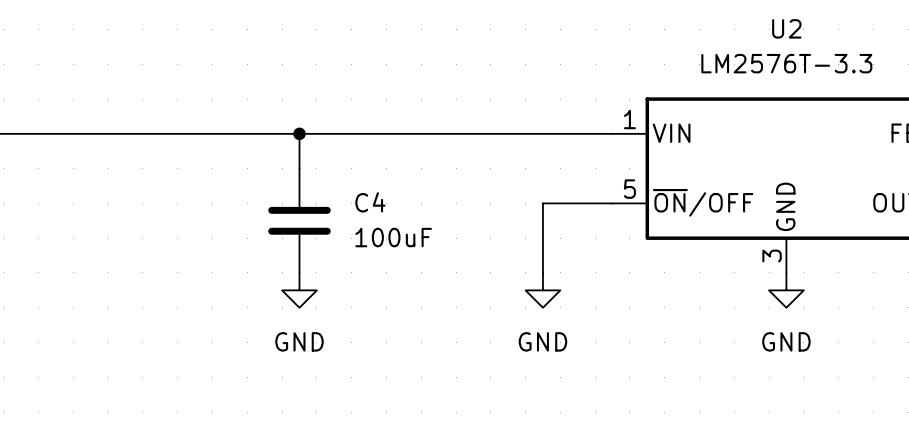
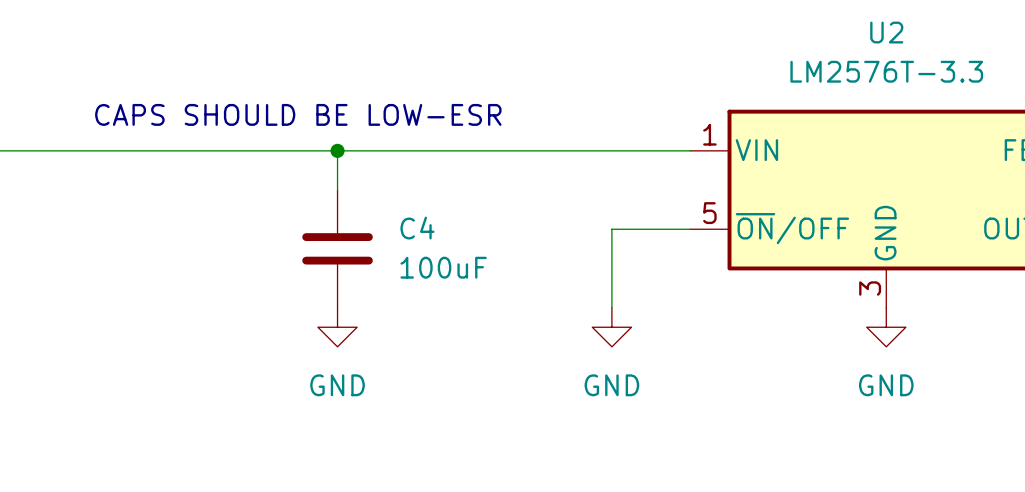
text: none -> CAPS SHOULD BE LOW-ESR (298, 114)

